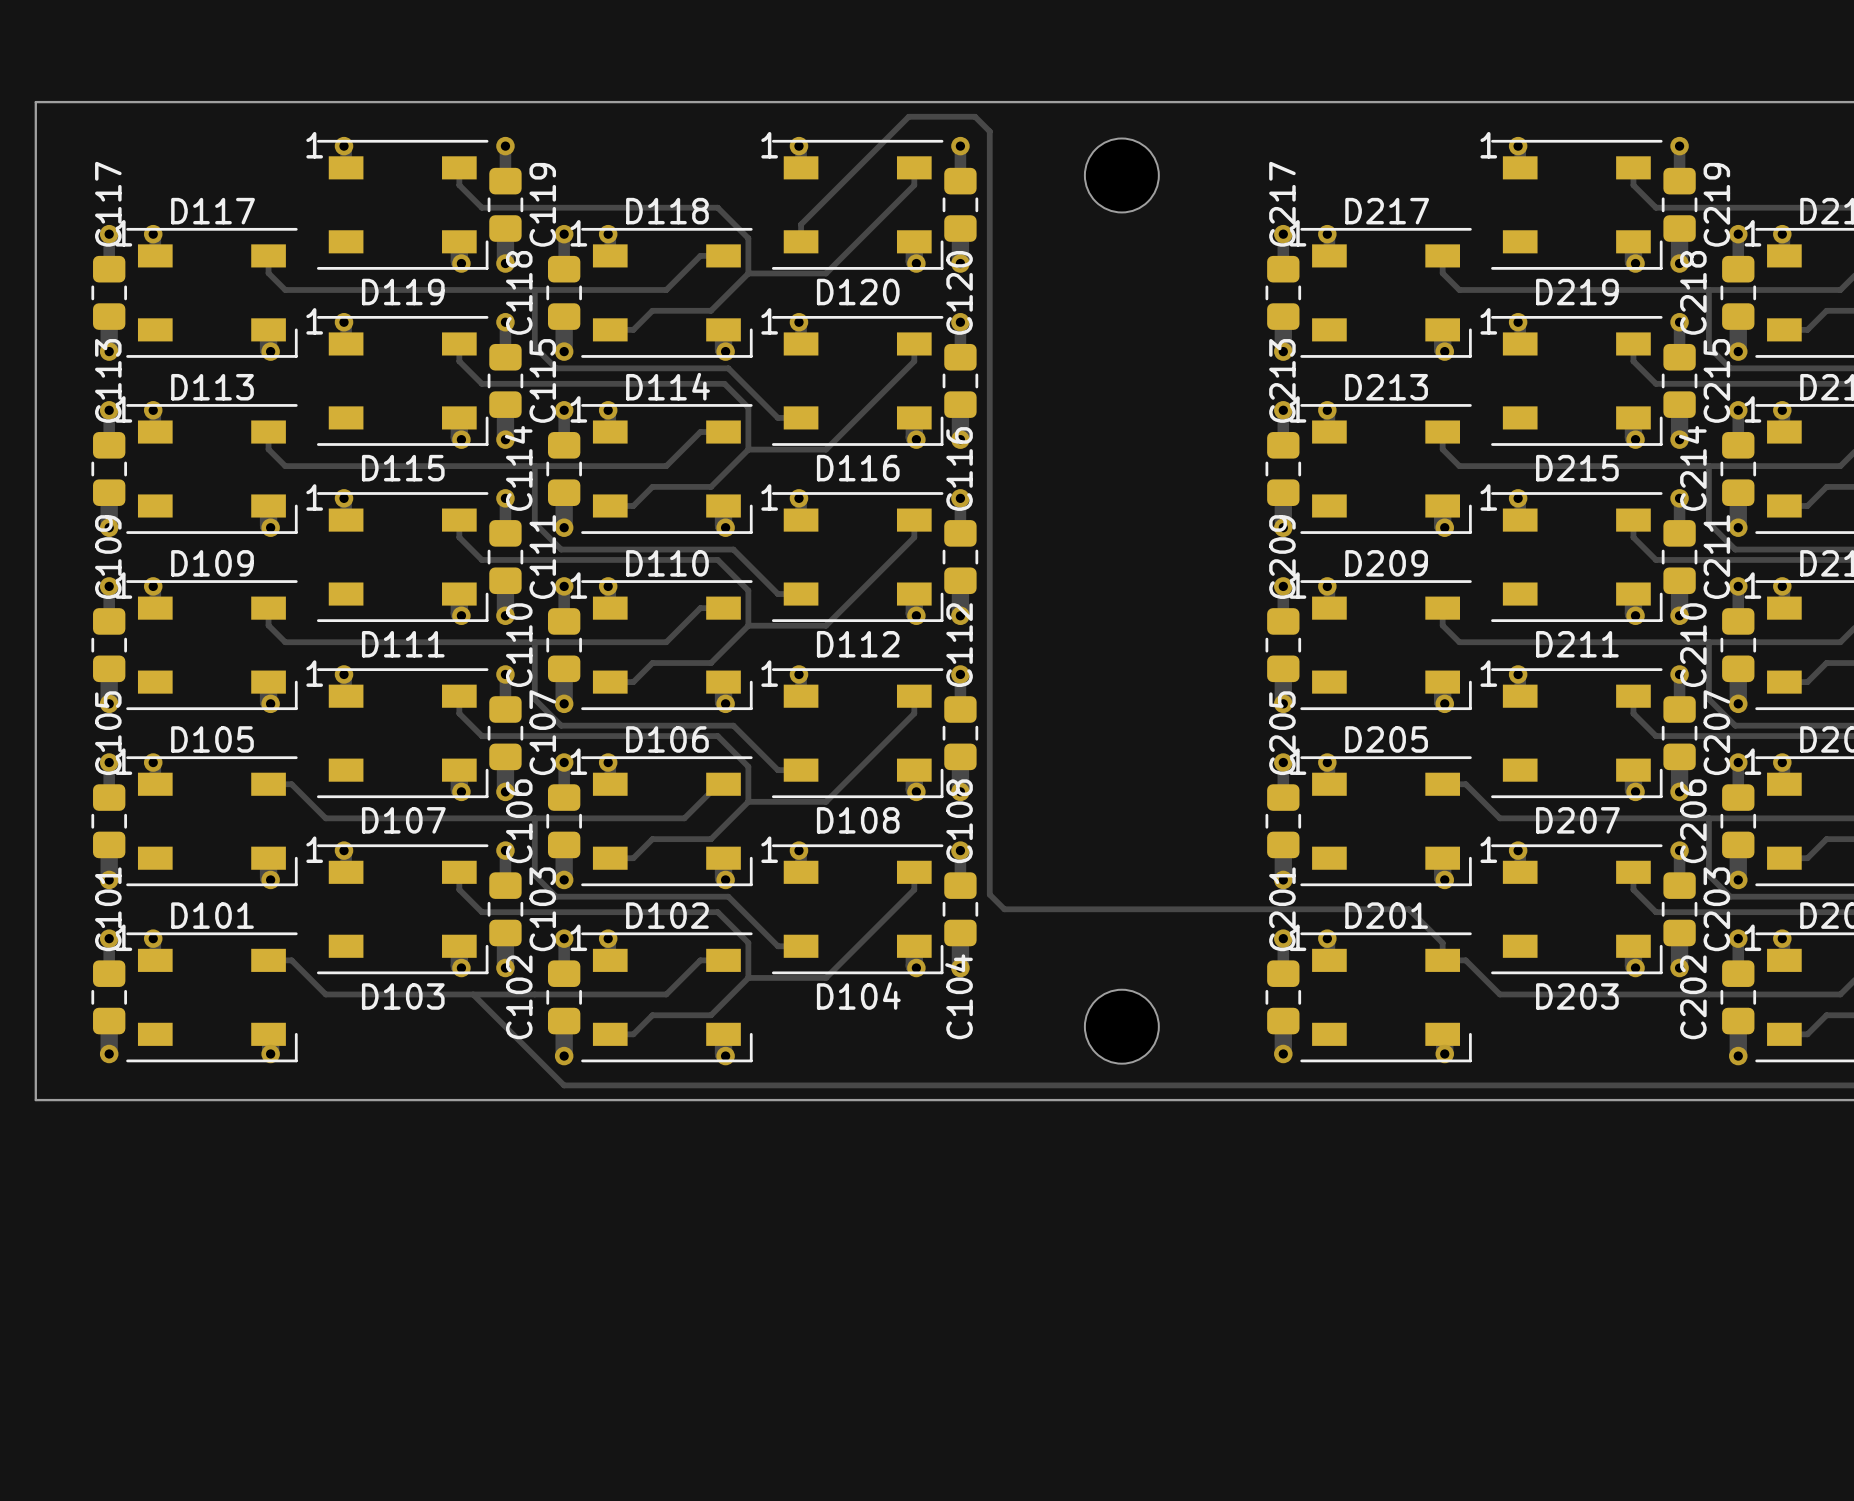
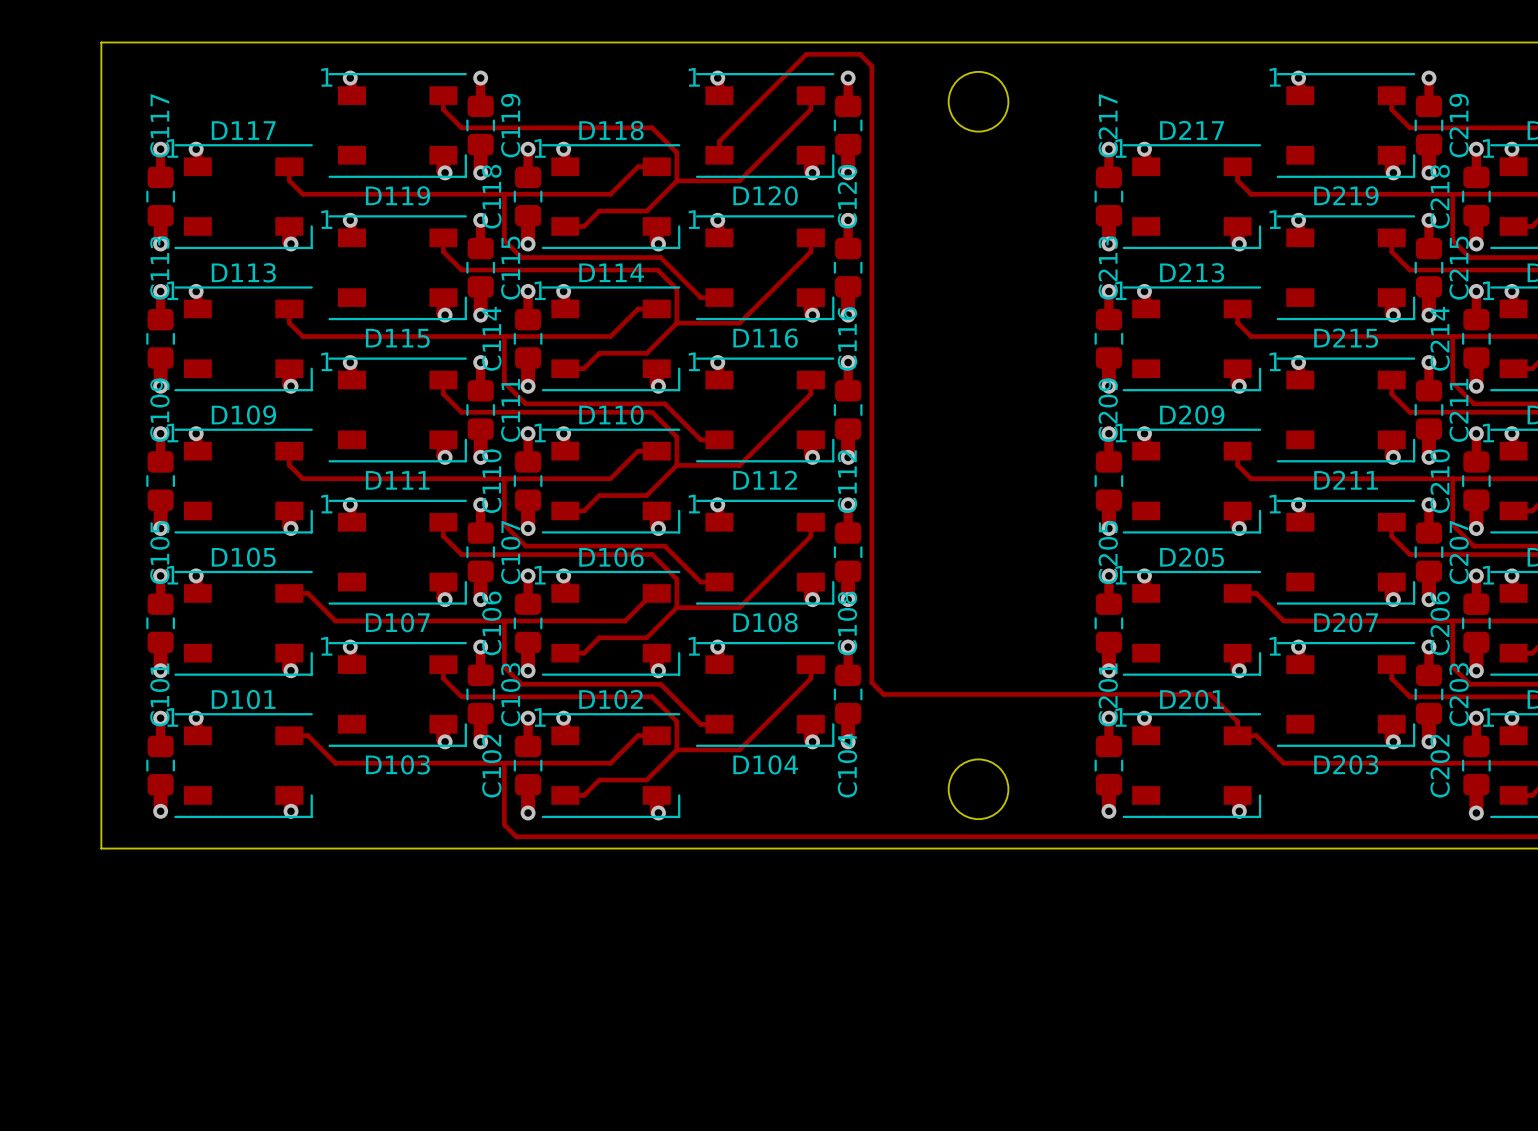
track: (473, 994) (564, 1085) -> (504, 763) (504, 824) (516, 836) (528, 836)

